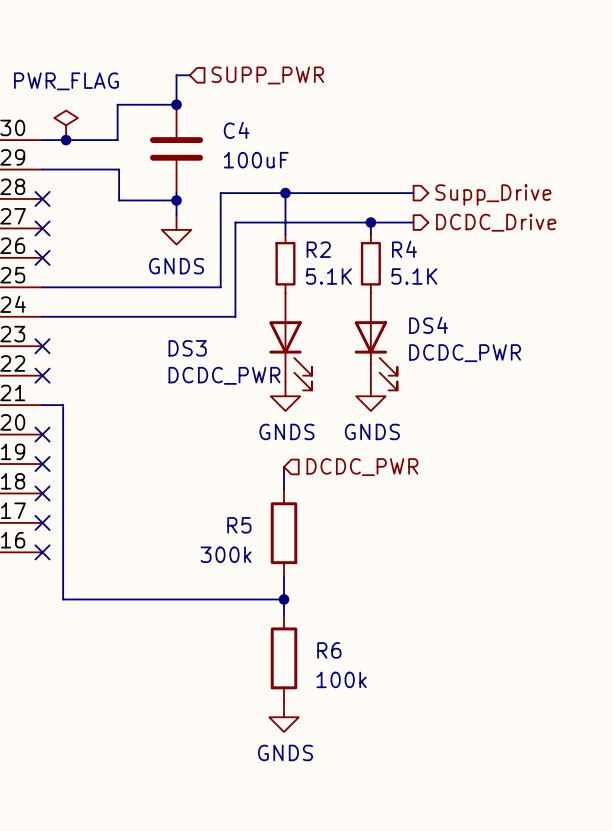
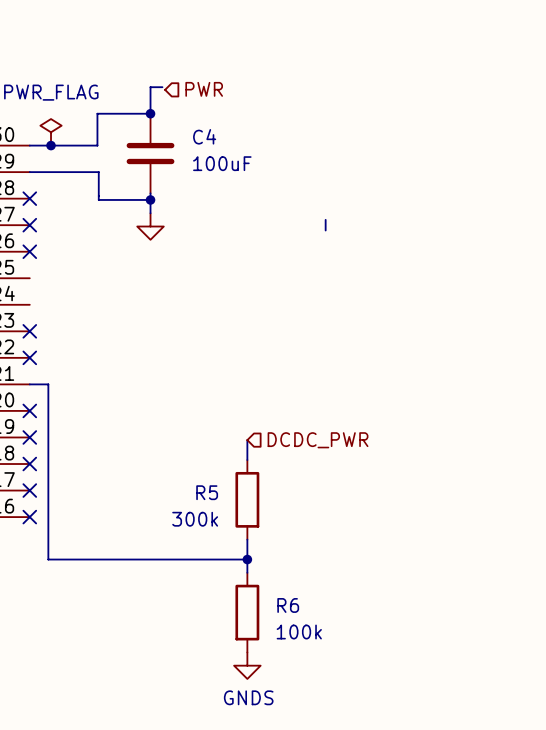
hierarchical label: SUPP_PWR (267, 75) -> PWR (204, 89)
wire: (285, 193) (285, 234) -> none
junction: (285, 193) -> none
wire: (413, 193) (220, 193) (220, 287) (42, 287) -> none
hierarchical label: Supp_Drive (493, 195) -> none
junction: (370, 222) -> none
wire: (413, 222) (235, 222) (235, 316) (42, 316) -> none
hierarchical label: DCDC_Drive (496, 222) -> none
R2: 5.1K (285, 263) -> none
R4: 5.1K (370, 263) -> none
power symbol text: GNDS (176, 266) -> none
DS3: DCDC_PWR (290, 341) -> none
DS4: DCDC_PWR (376, 341) -> none
power symbol: GNDS (285, 396) -> none
power symbol: GNDS (370, 396) -> none

